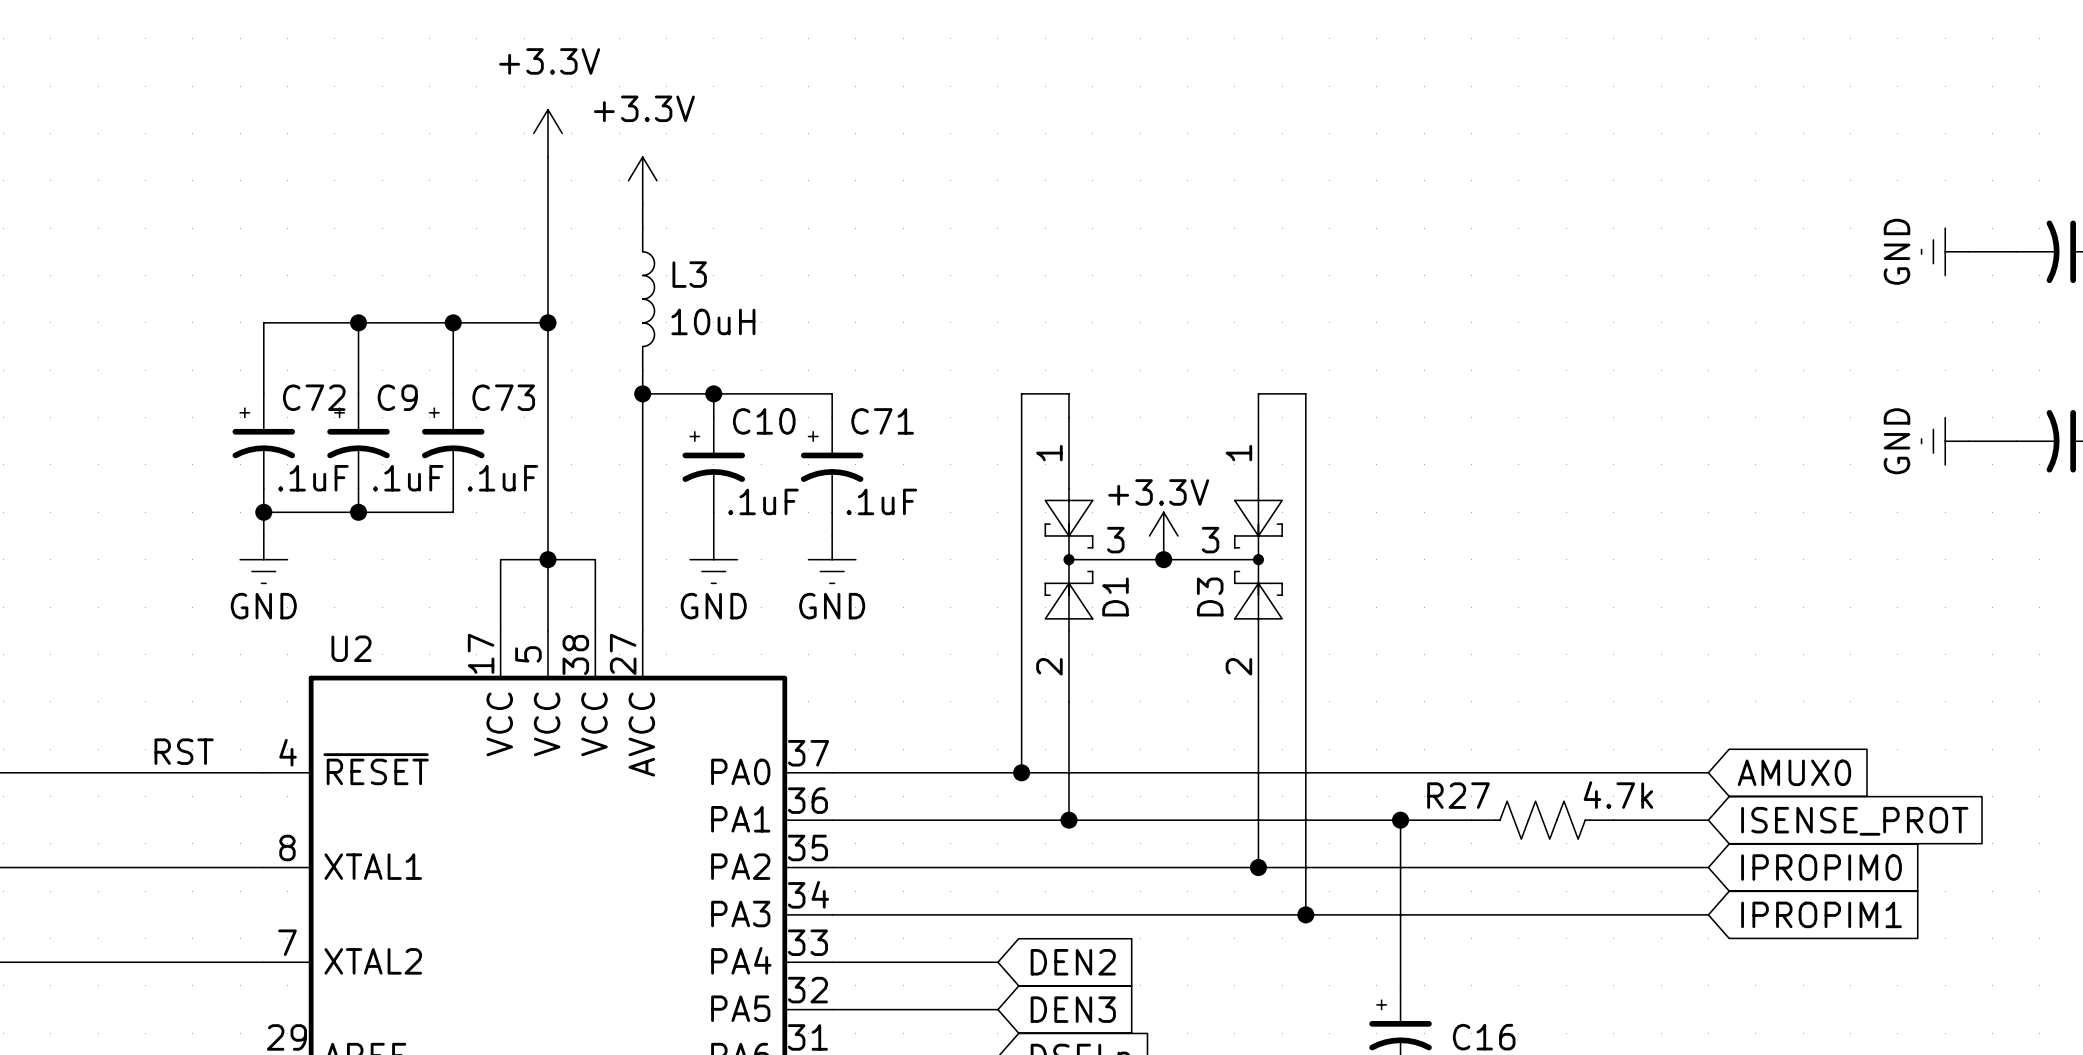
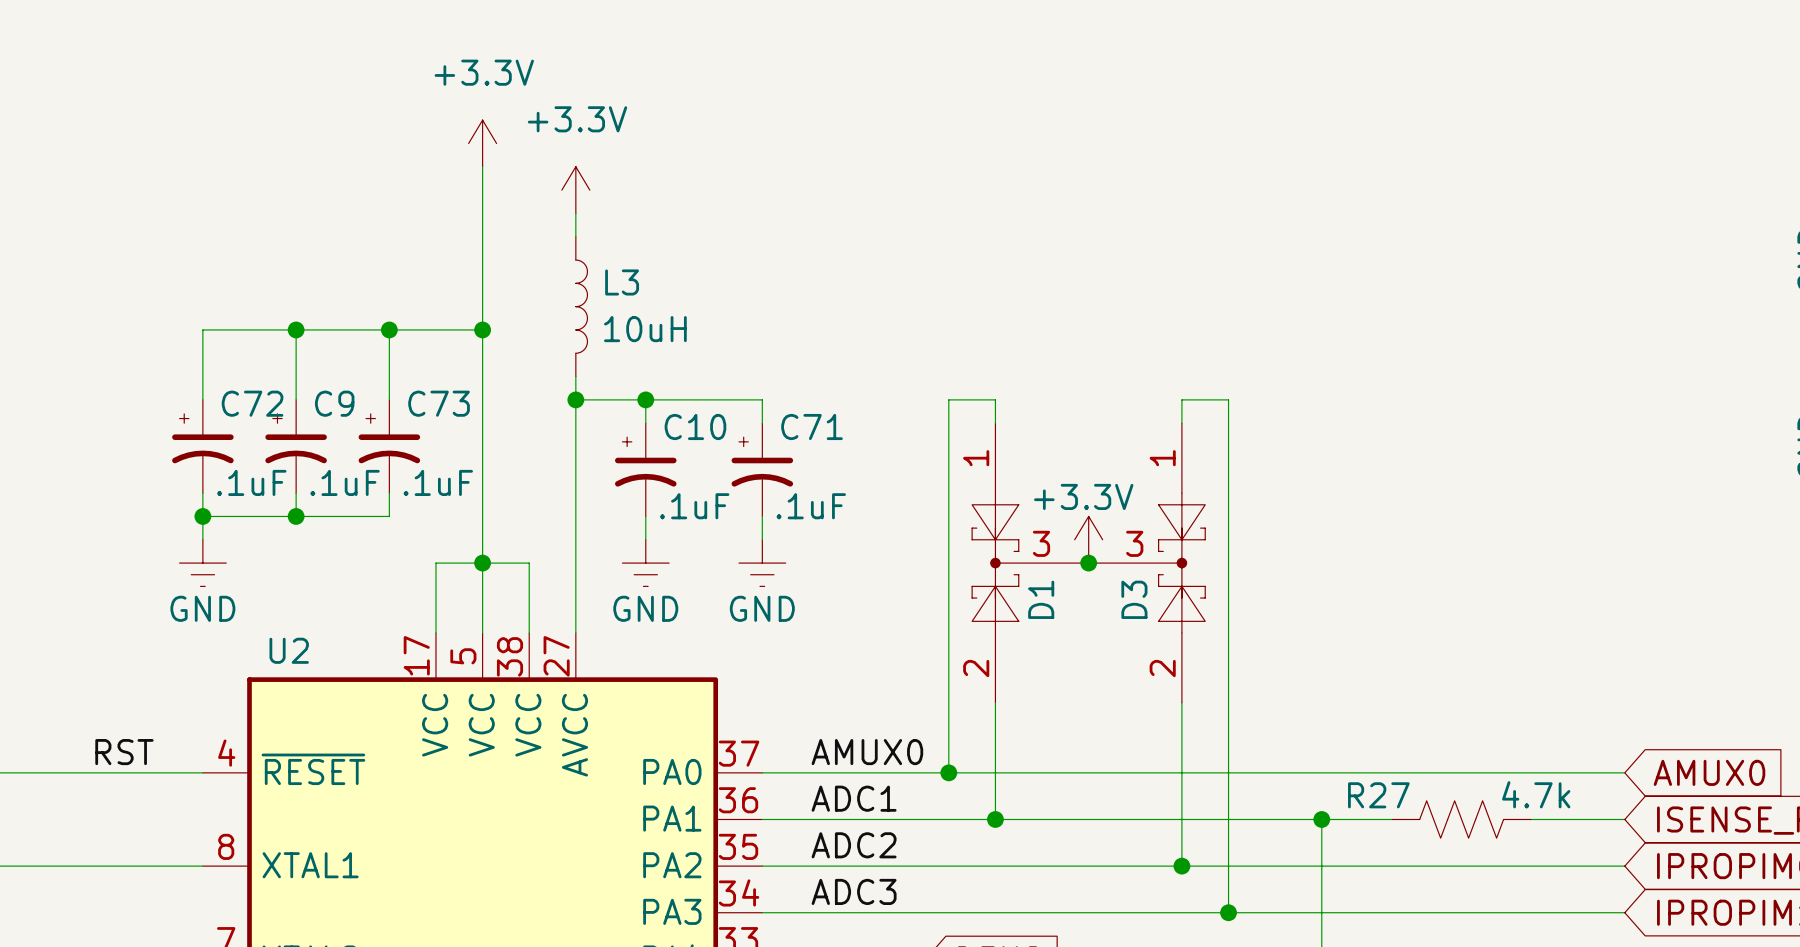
label: none -> AMUX0 (867, 752)
label: none -> ADC1 (854, 798)
label: none -> ADC2 (854, 845)
label: none -> ADC3 (854, 891)

